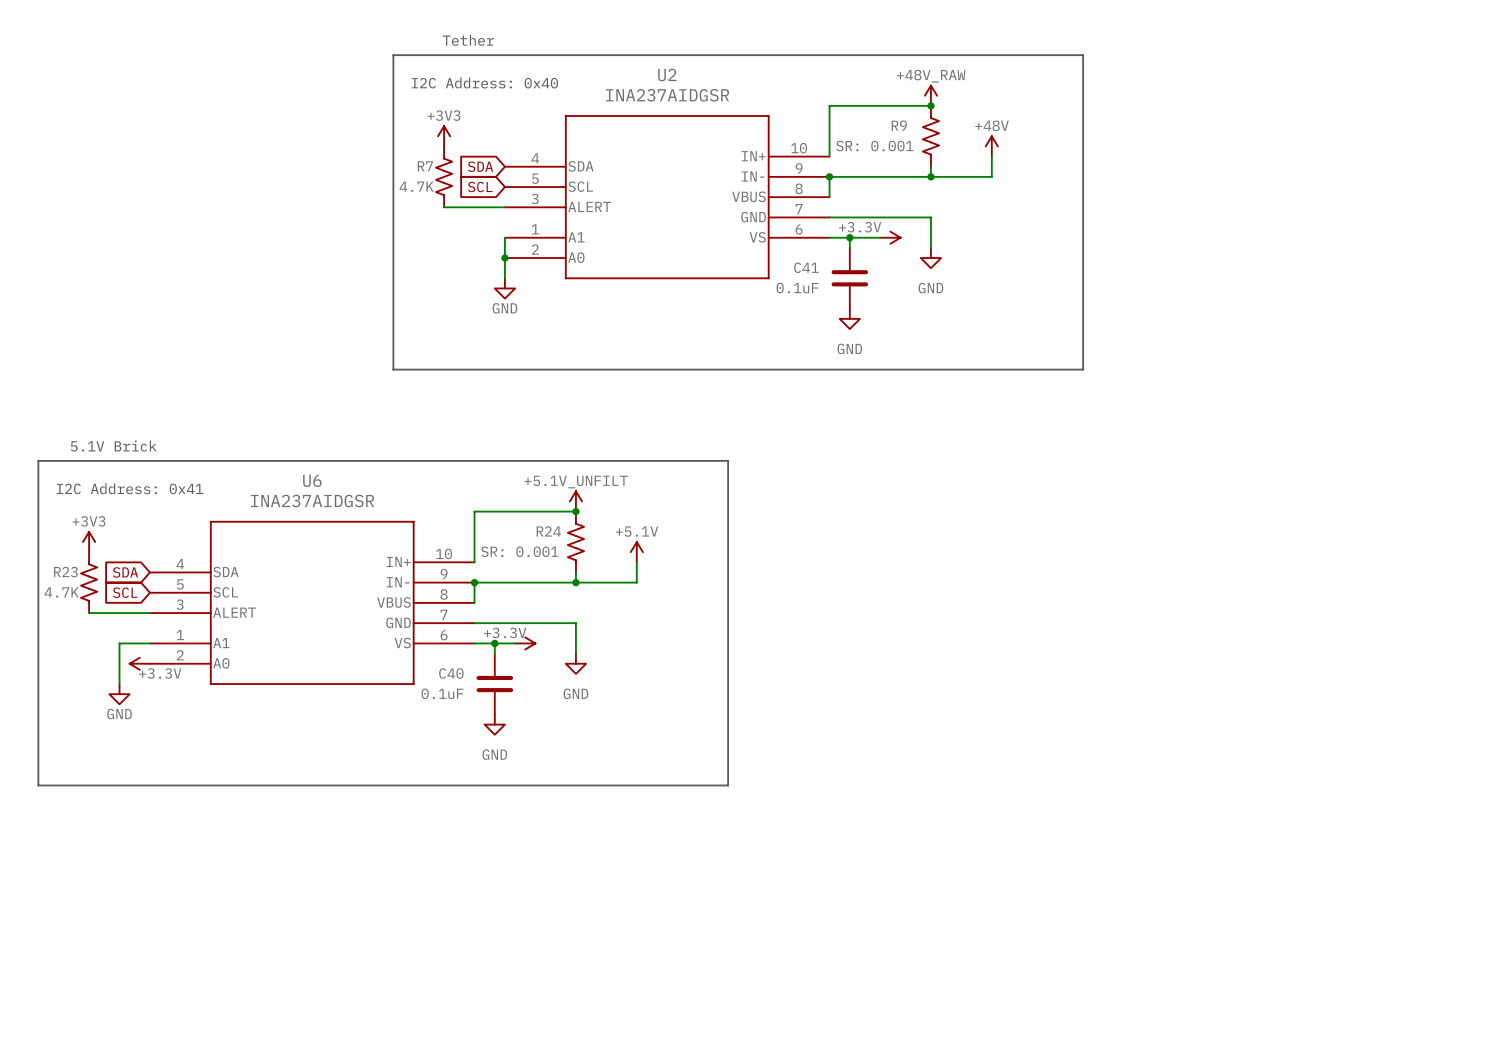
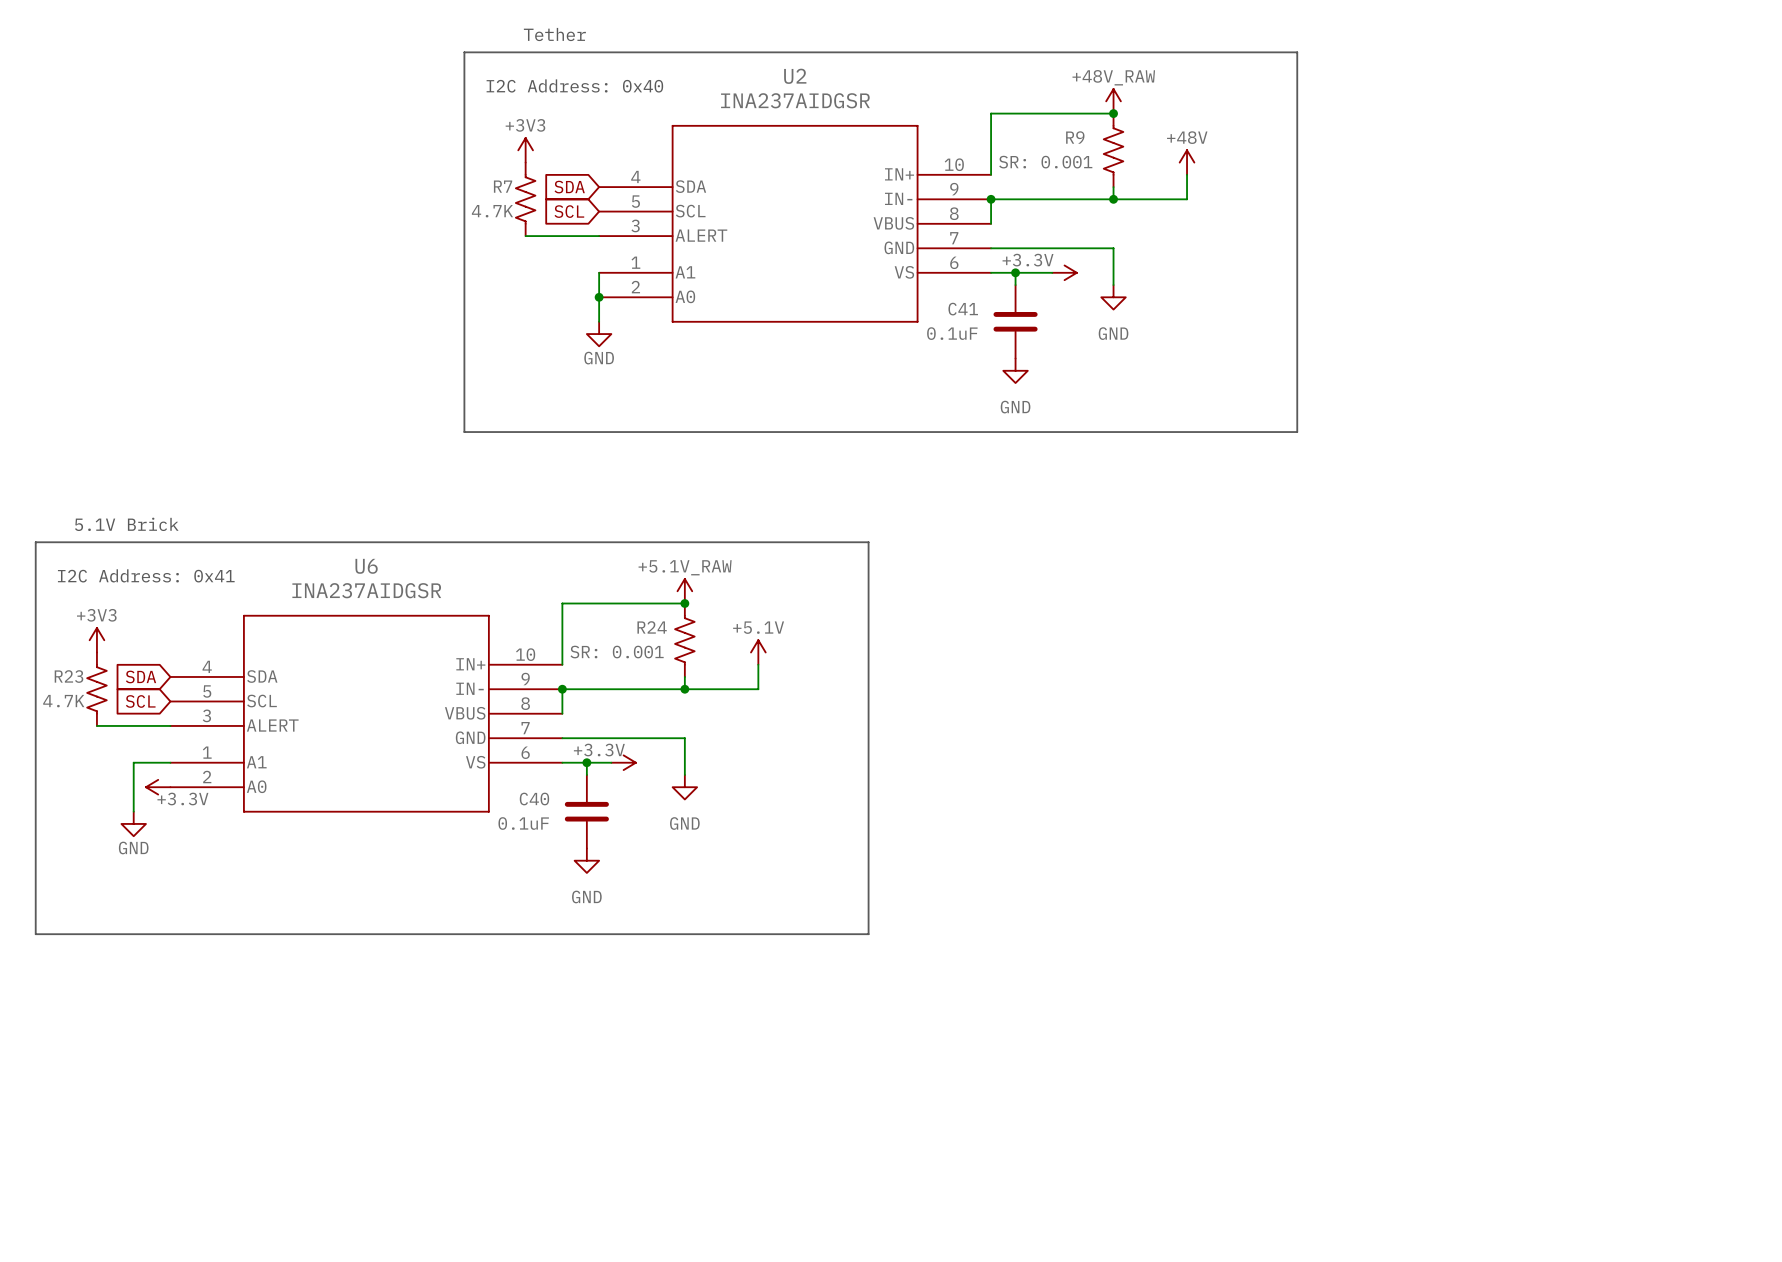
power symbol: +5.1V_UNFILT (575, 501) -> +5.1V_RAW (684, 591)

